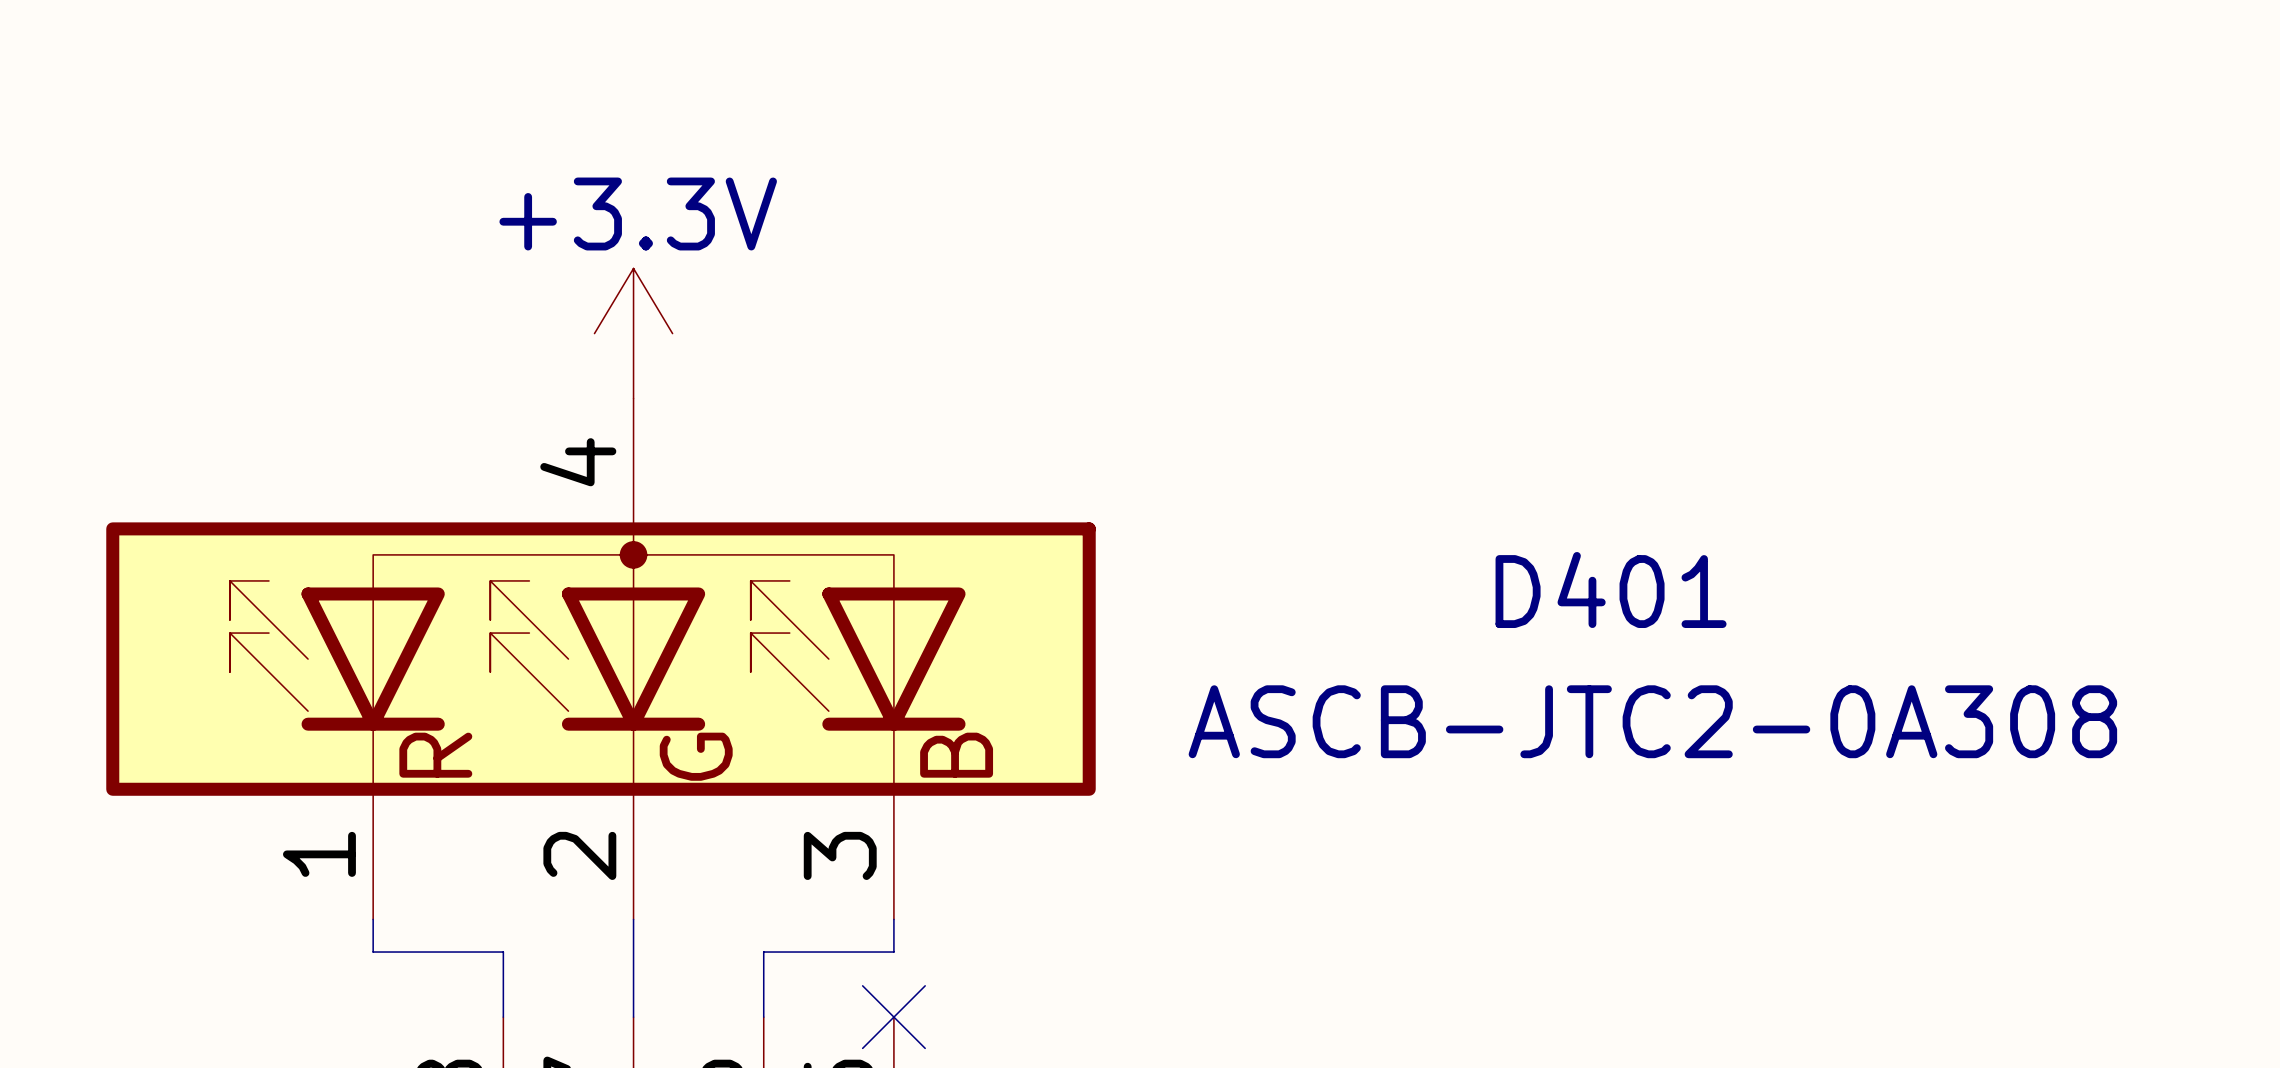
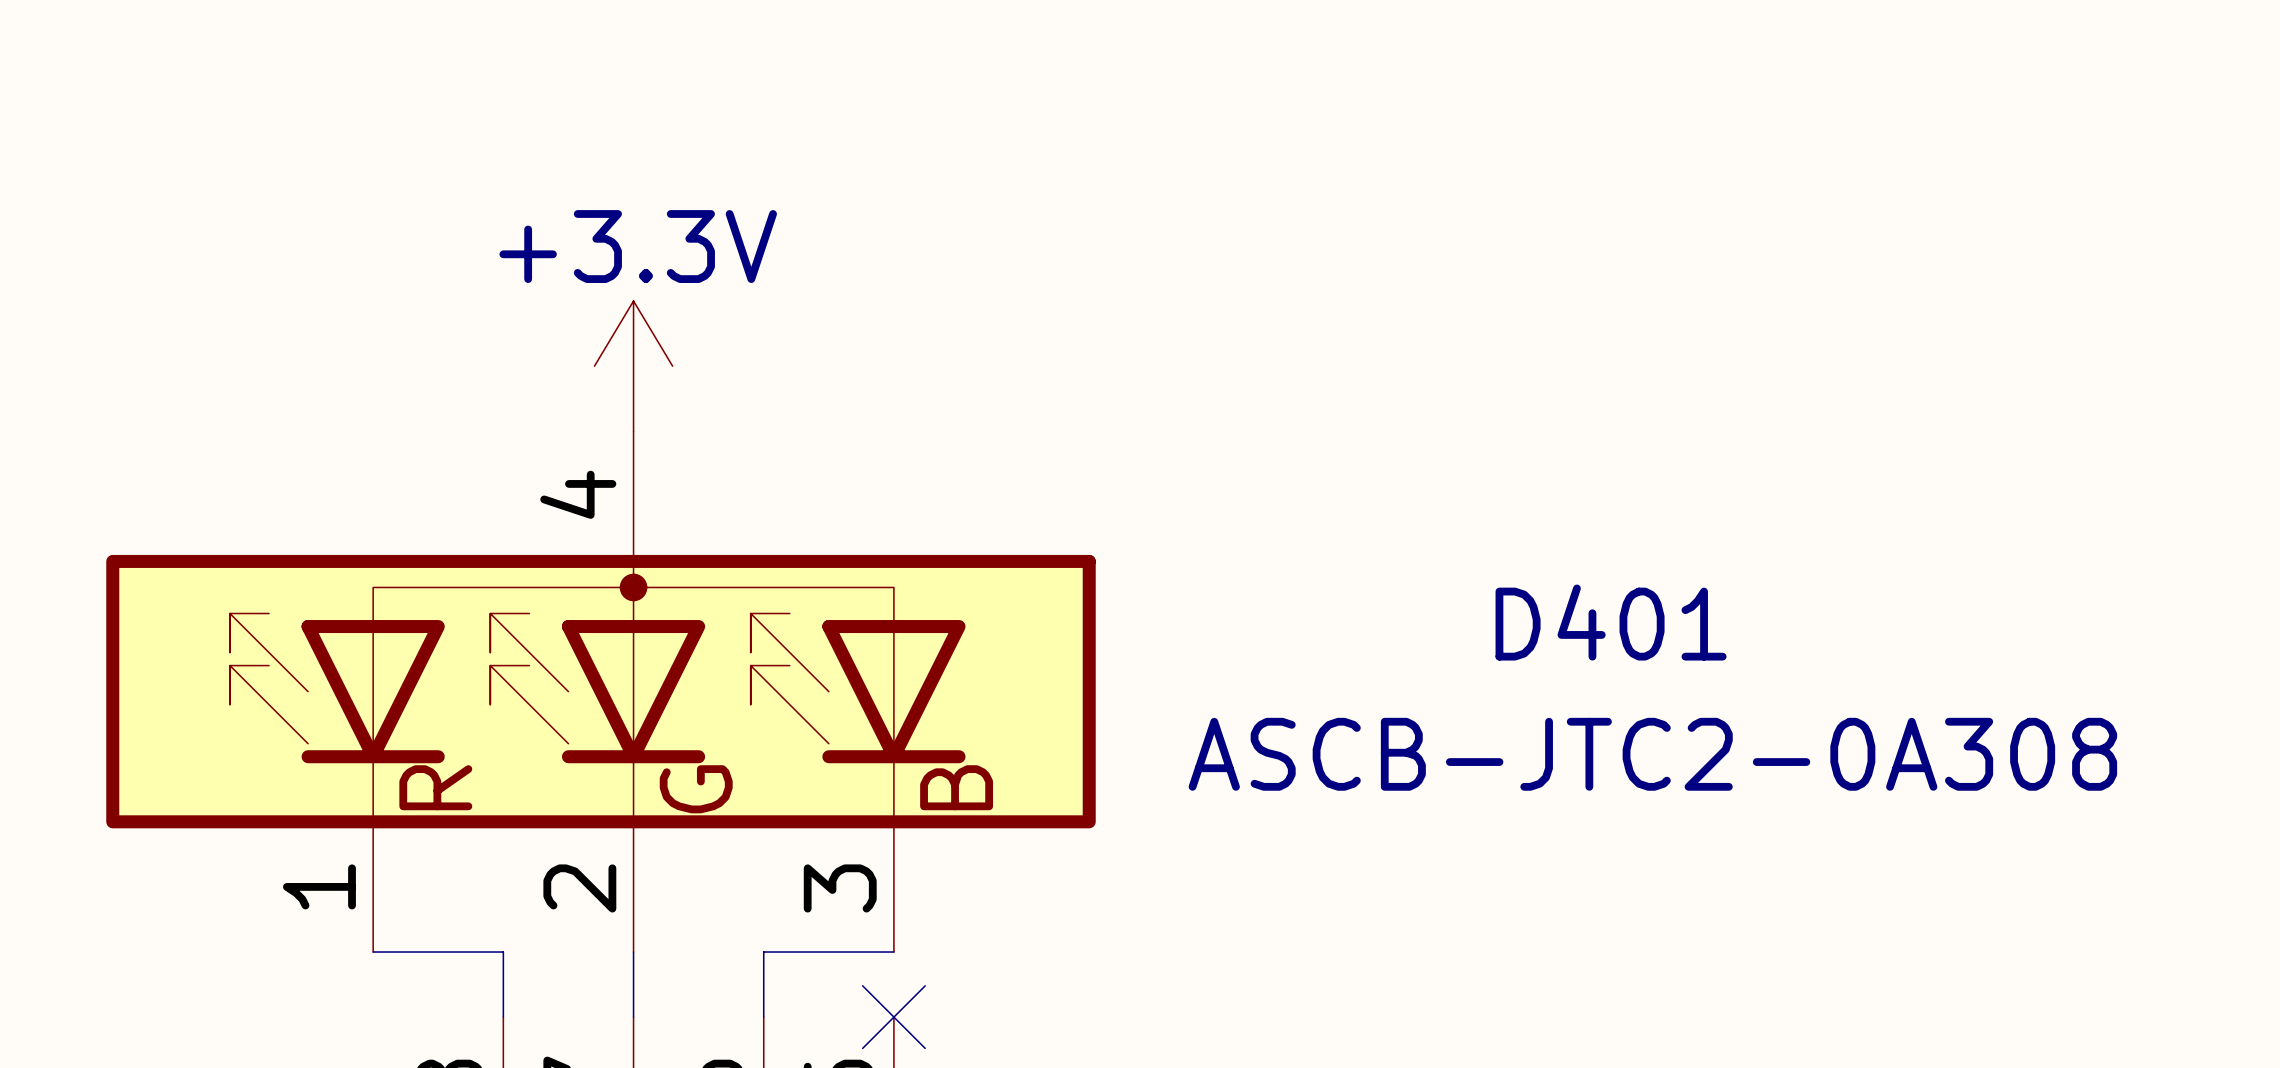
power symbol position: +3.3V (633, 333) -> +3.3V (633, 366)
D401 position: (600, 659) -> (600, 691)

